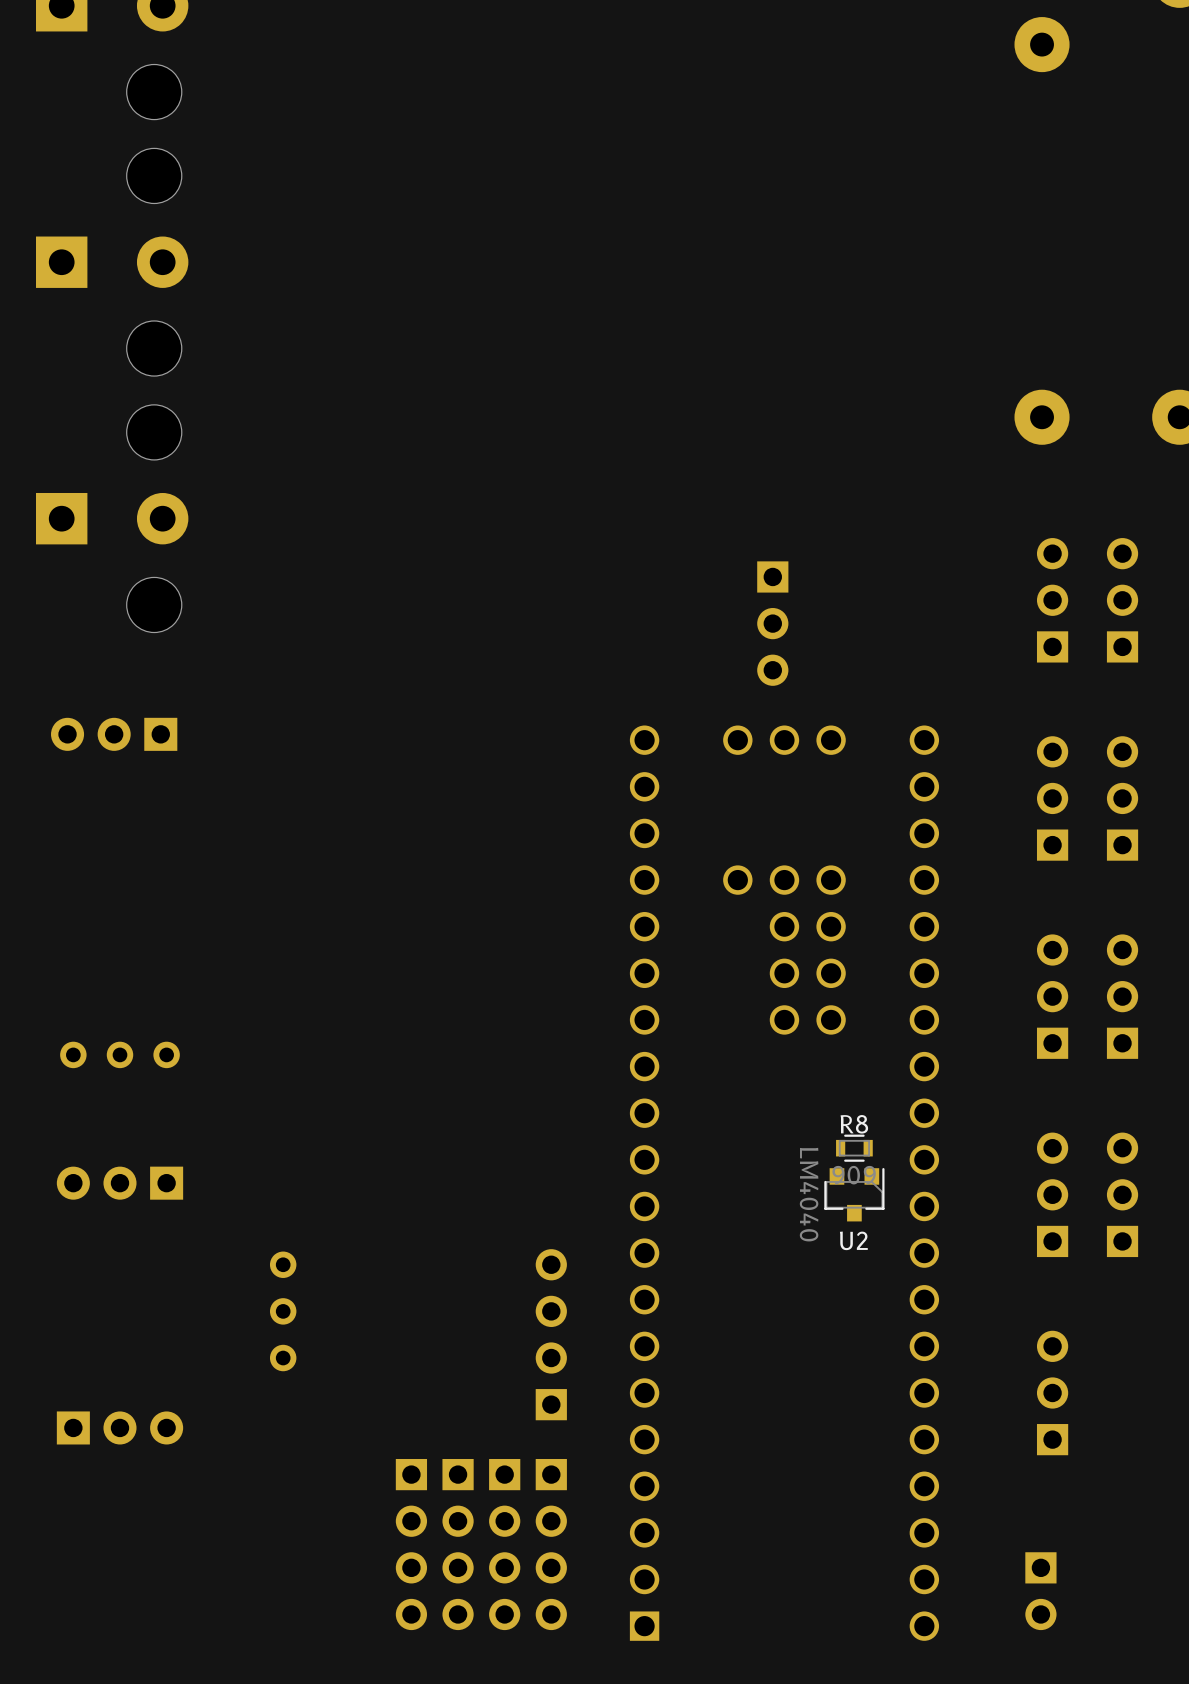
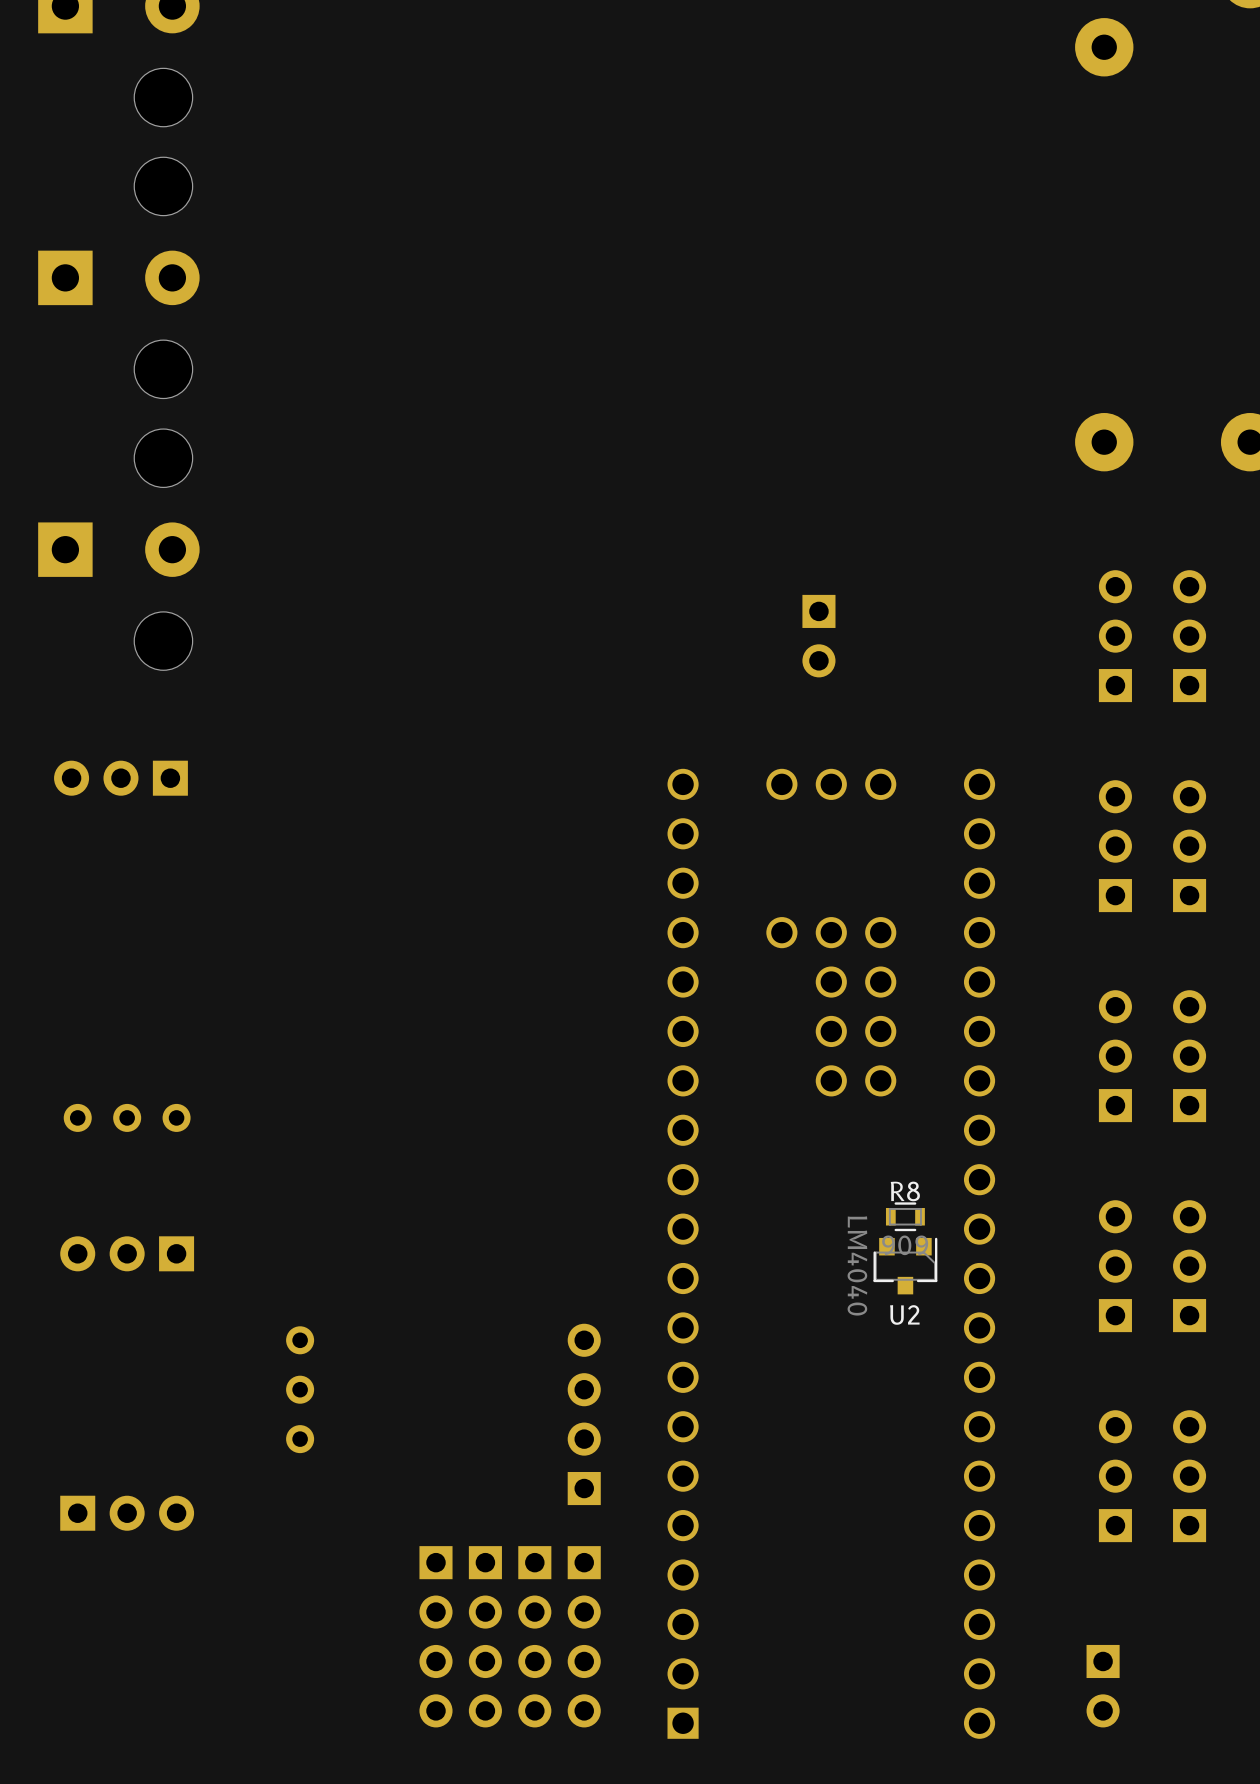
part: (772, 623) -> none
part: none -> (1189, 1476)

